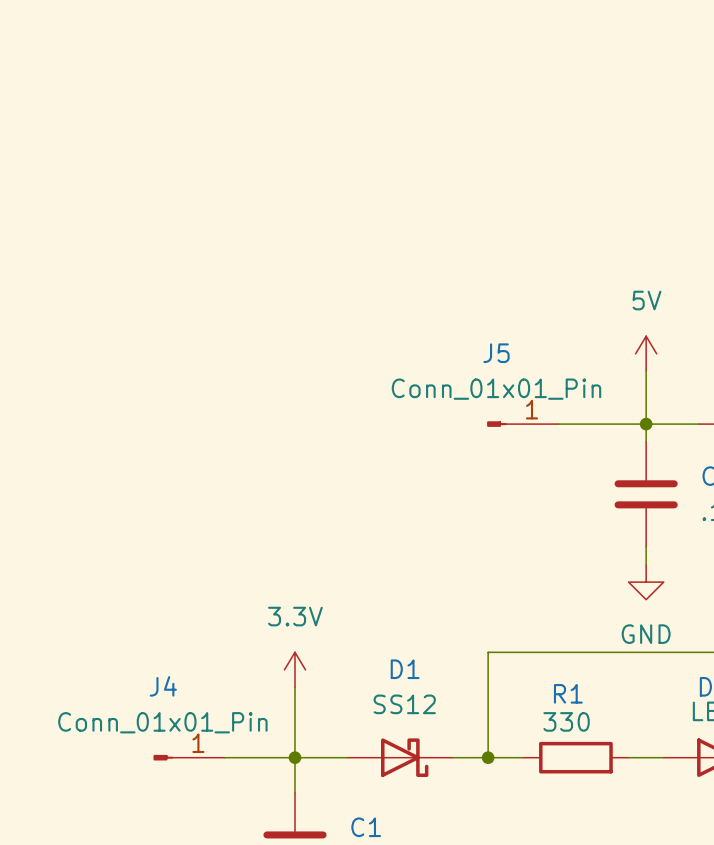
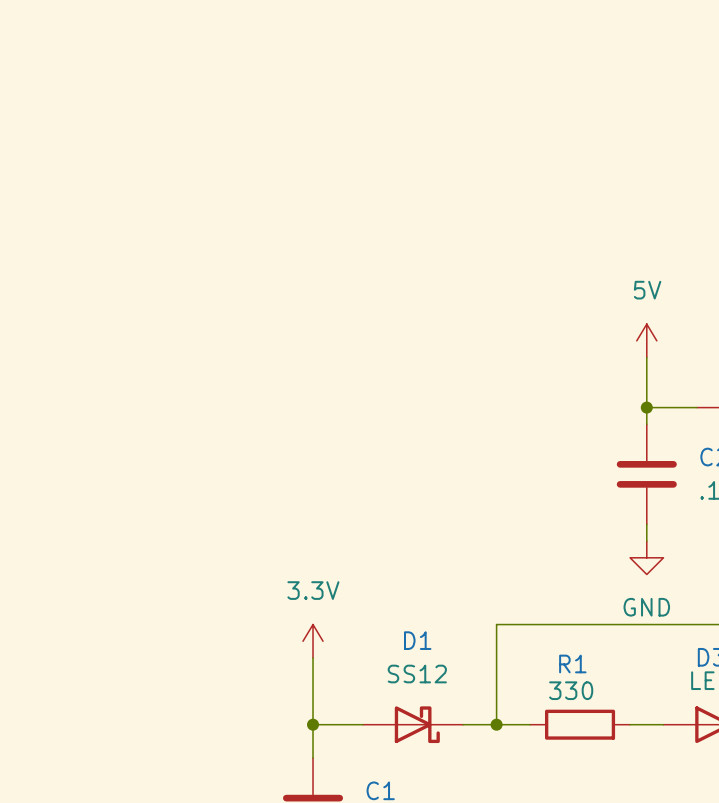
J5: Conn_01x01_Pin (522, 424) -> none
wire: (558, 424) (646, 424) -> none
J4: Conn_01x01_Pin (189, 757) -> none
wire: (224, 757) (294, 757) -> none

